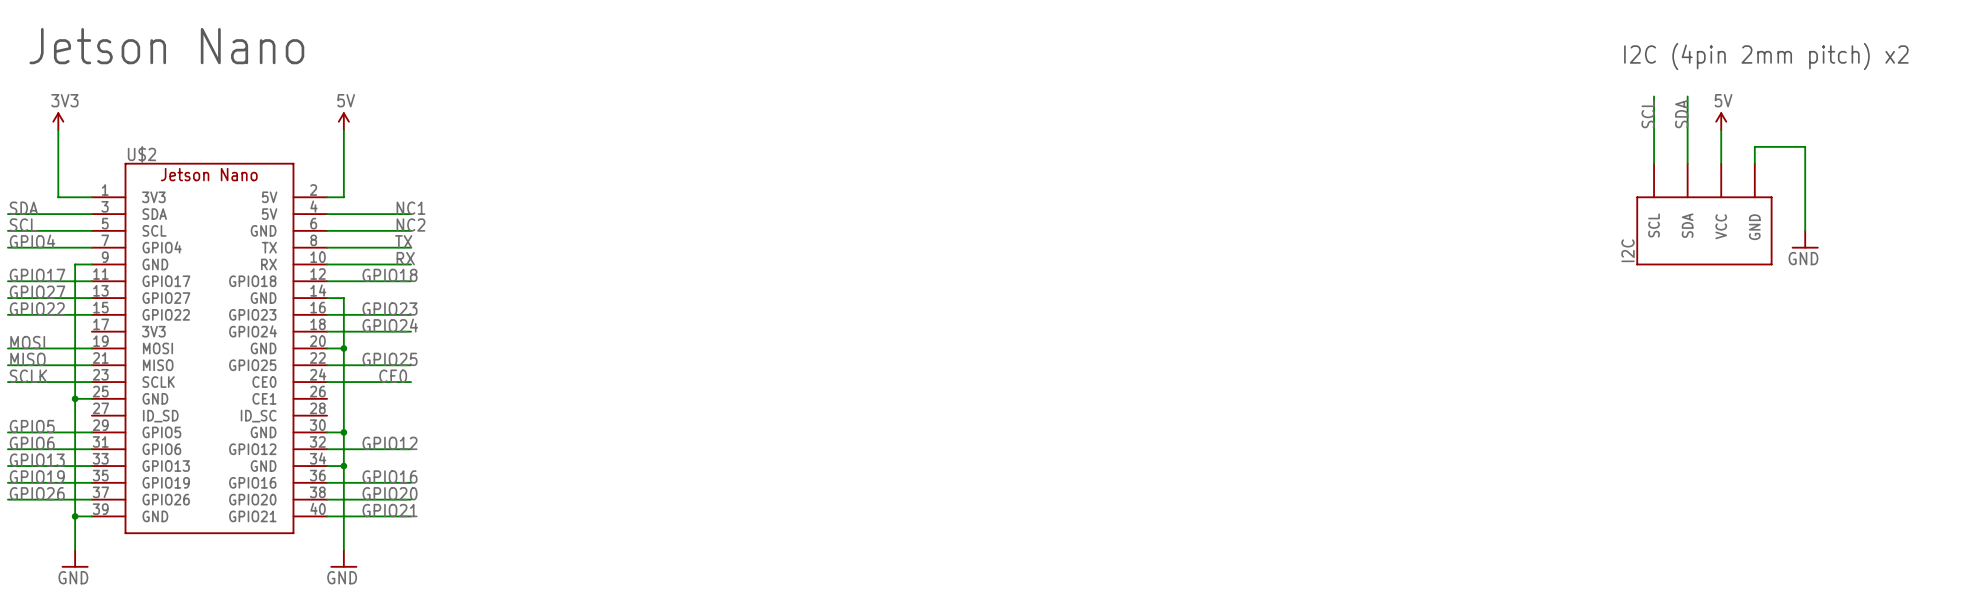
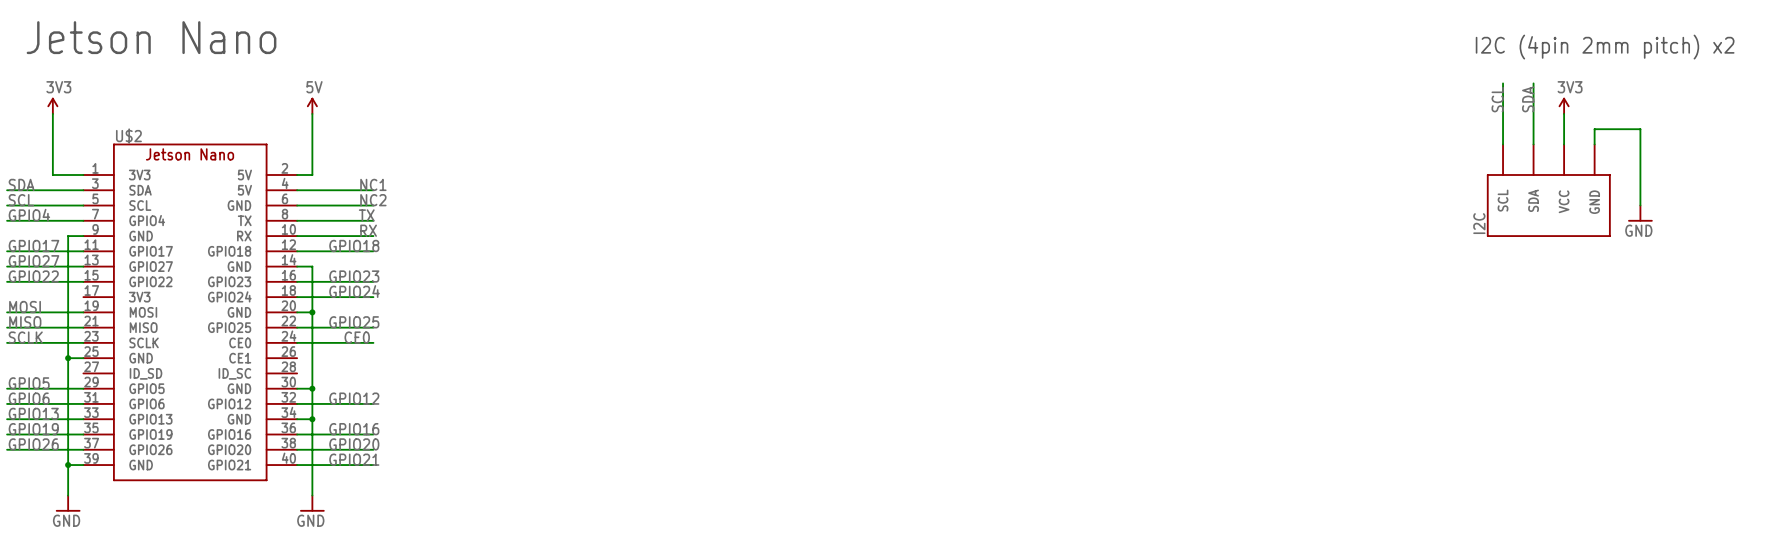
power symbol: 5V (1721, 121) -> 3V3 (1564, 106)

